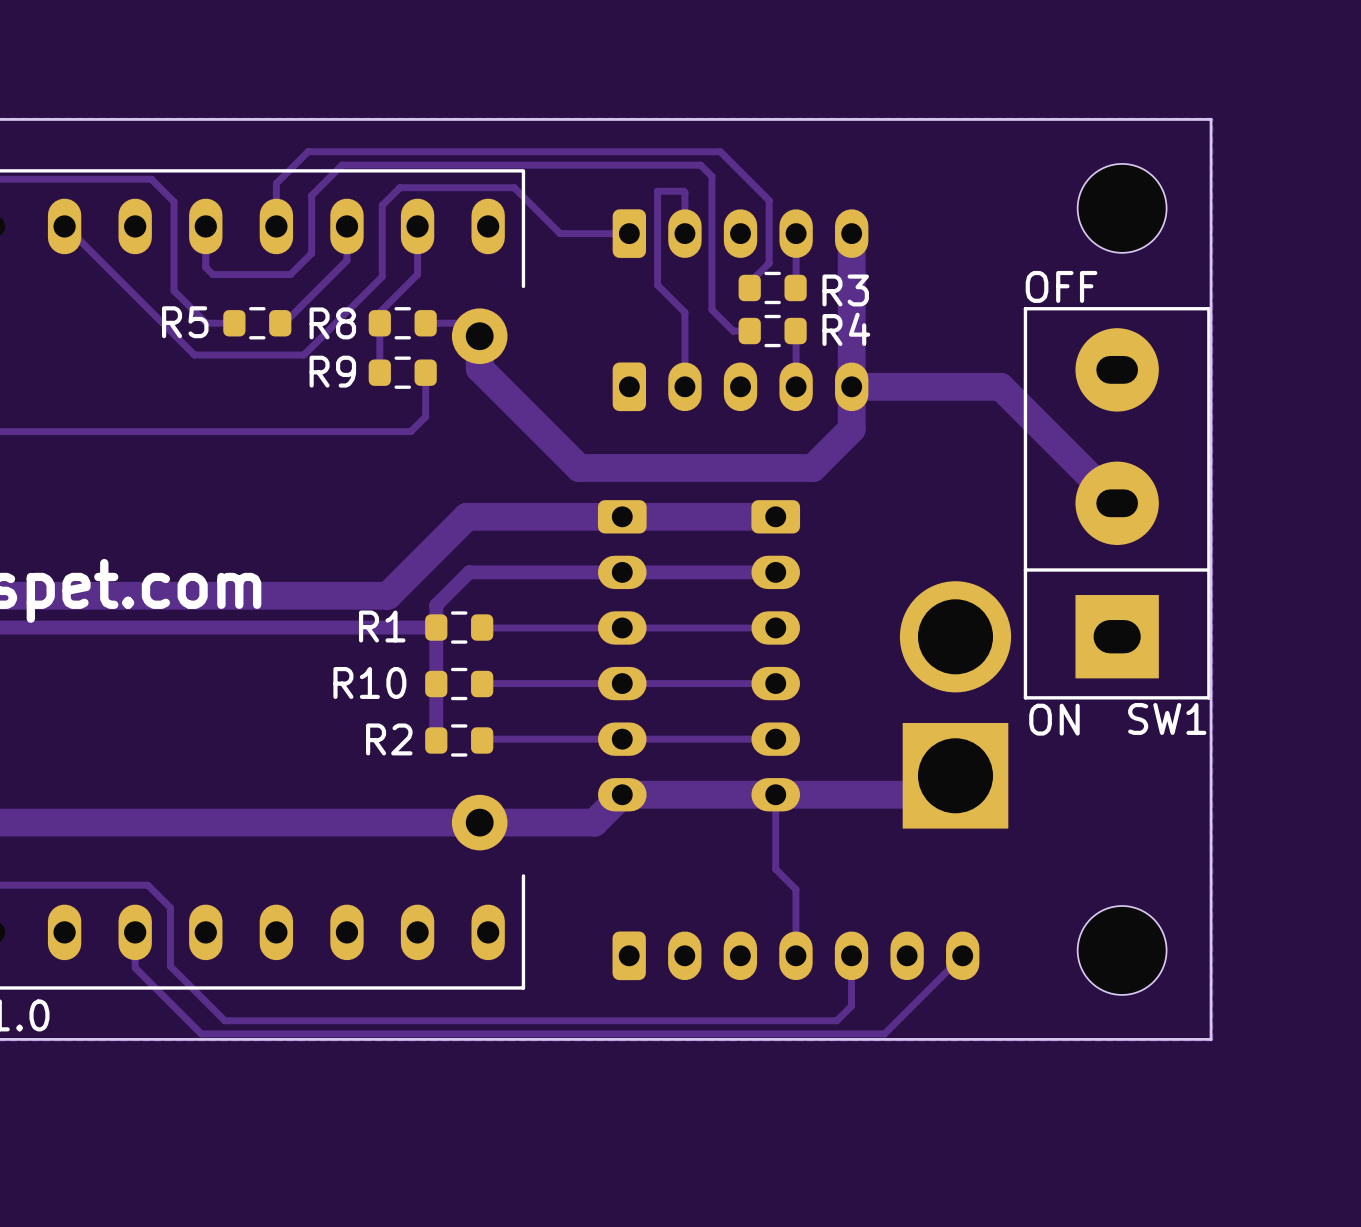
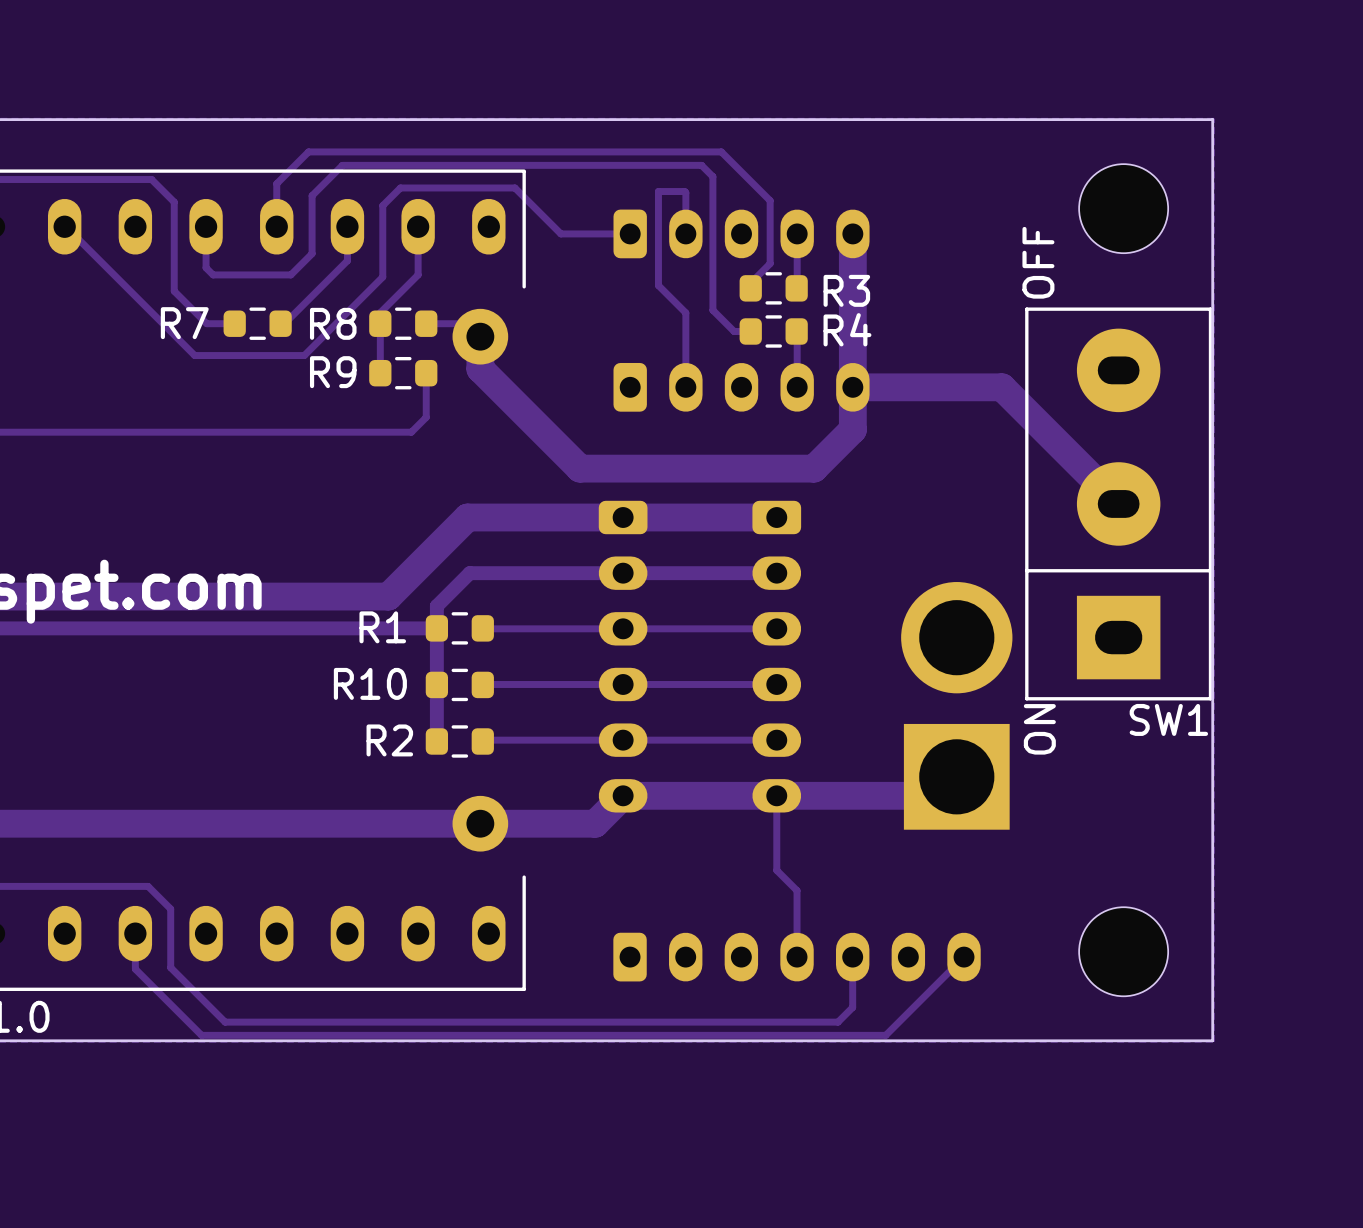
text rotation: 0° (1061, 286) -> 90° counterclockwise (1038, 262)
R5 name: R5 (185, 322) -> R7 (184, 323)
text rotation: 0° (1054, 719) -> 90° counterclockwise (1039, 729)

